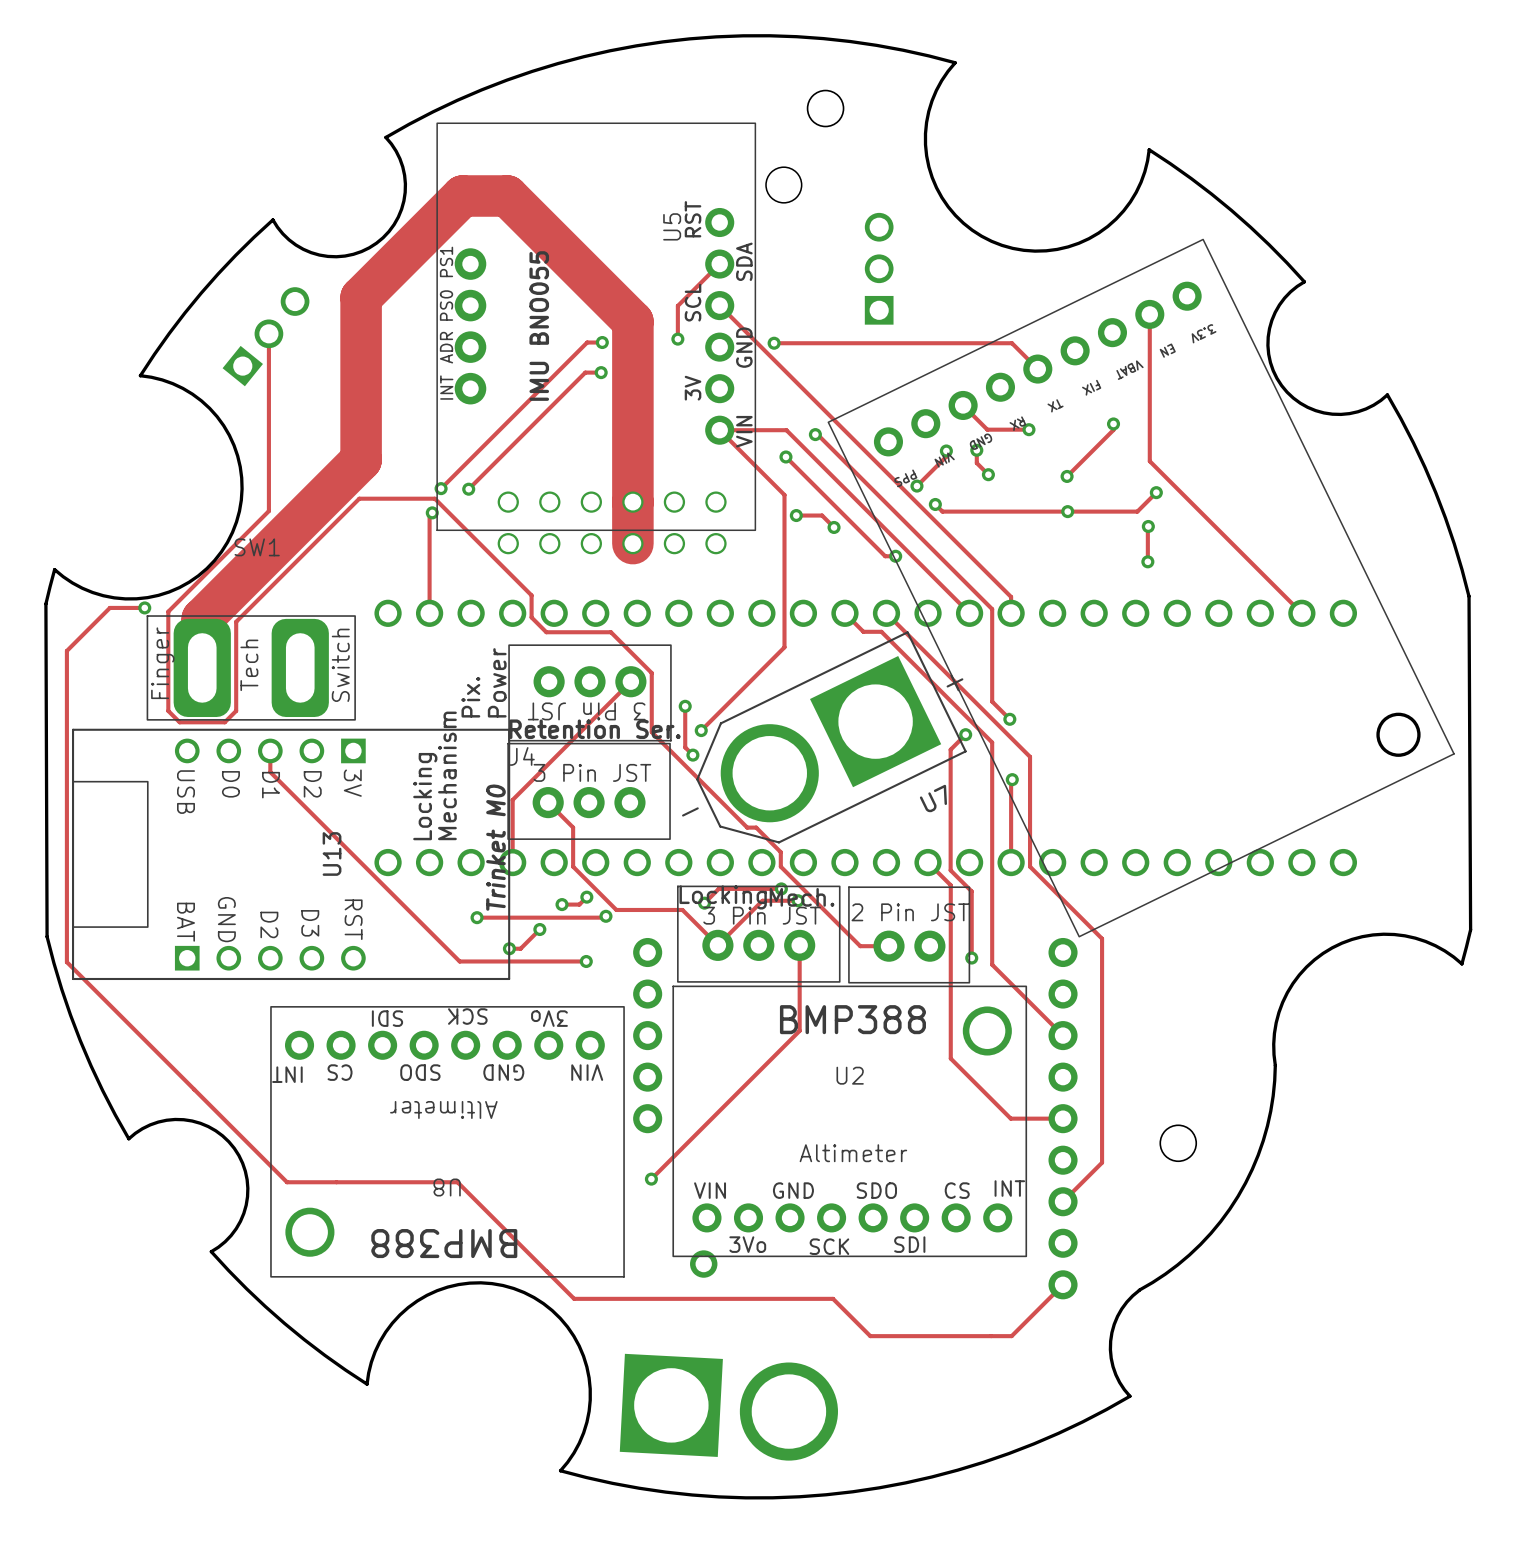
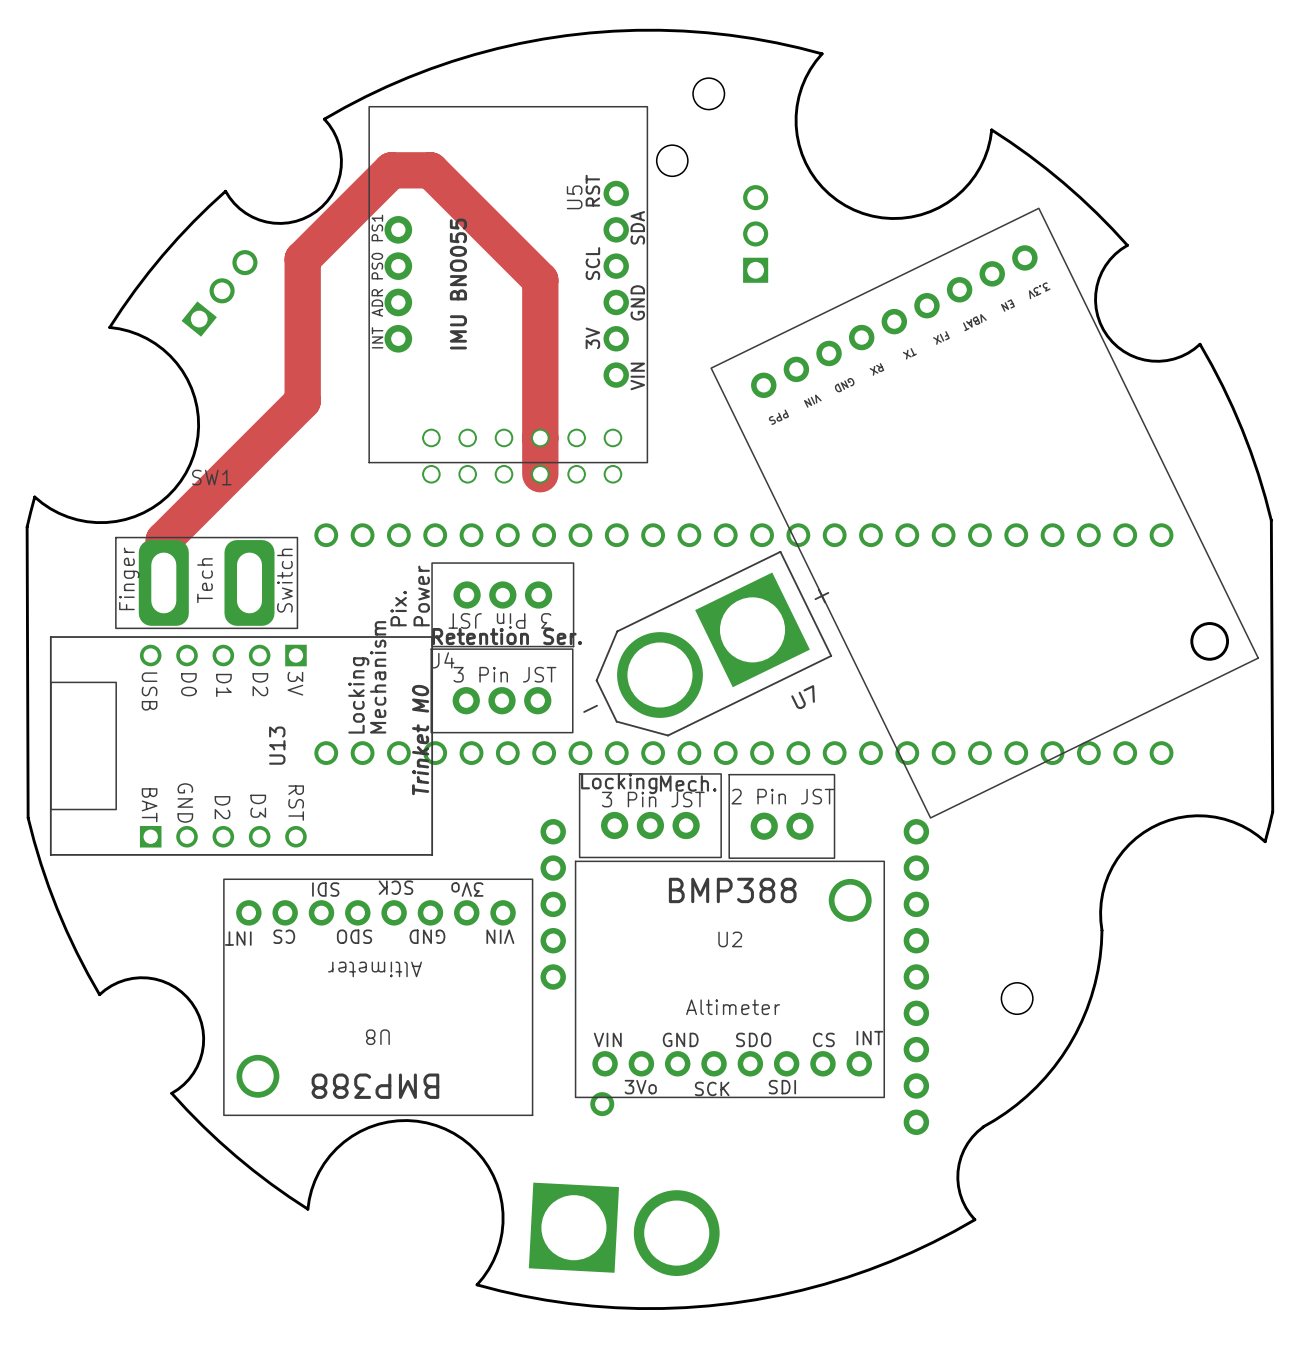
track: (719, 264) (677, 305) (677, 339) -> none
track: (719, 305) (1011, 596) (1011, 613) -> none
track: (1149, 314) (1149, 461) (1301, 613) -> none
track: (268, 333) (268, 511) (168, 611) (168, 710) (179, 722) (224, 722) (236, 710) (236, 621) (359, 498) (434, 498) (531, 595) (531, 617) (546, 632) (610, 632) (651, 673) (651, 732) (747, 827) (756, 827) (780, 852) (780, 866) (860, 946) (889, 946) -> none
via: (677, 339) -> none
track: (602, 342) (587, 342) (441, 488) -> none
via: (602, 342) -> none
track: (774, 343) (1011, 343) (1037, 369) -> none
via: (774, 343) -> none
track: (601, 372) (585, 372) (468, 489) -> none
via: (601, 372) -> none
track: (963, 405) (987, 429) (1028, 429) -> none
track: (1113, 423) (1113, 430) (1067, 476) -> none
via: (1113, 423) -> none
via: (1028, 429) -> none
track: (815, 434) (817, 434) (992, 609) (992, 701) (1009, 719) -> none
via: (815, 434) -> none
track: (946, 450) (946, 456) (916, 486) -> none
via: (946, 450) -> none
track: (976, 450) (976, 463) (988, 474) -> none
via: (976, 450) -> none
track: (785, 456) (885, 556) (895, 556) -> none
via: (785, 456) -> none
via: (988, 474) -> none
via: (1067, 476) -> none
via: (916, 486) -> none
via: (441, 488) -> none
via: (468, 489) -> none
track: (1156, 492) (1137, 511) (942, 511) (935, 504) -> none
via: (1156, 492) -> none
via: (935, 504) -> none
via: (1067, 511) -> none
track: (432, 512) (429, 515) (429, 613) -> none
via: (432, 512) -> none
track: (796, 515) (822, 515) (834, 527) -> none
via: (796, 515) -> none
track: (1148, 526) (1147, 561) -> none
via: (1148, 526) -> none
via: (834, 527) -> none
via: (895, 556) -> none
via: (1147, 561) -> none
track: (144, 607) (109, 607) (66, 650) (66, 962) (287, 1182) (457, 1182) (574, 1298) (833, 1298) (870, 1336) (1011, 1336) (1063, 1284) -> none
via: (144, 607) -> none
track: (844, 613) (863, 631) (881, 631) (992, 742) (992, 964) (1063, 1035) -> none
track: (886, 613) (1030, 756) (1030, 866) (1102, 938) (1102, 1162) (1063, 1201) -> none
track: (969, 613) (786, 430) (719, 430) (784, 494) (784, 647) (701, 730) -> none
track: (630, 681) (512, 799) (512, 862) -> none
track: (685, 706) (685, 747) (692, 755) -> none
via: (685, 706) -> none
via: (1009, 719) -> none
via: (701, 730) -> none
track: (965, 734) (950, 749) (950, 870) (971, 891) (971, 958) -> none
via: (965, 734) -> none
track: (270, 750) (270, 772) (459, 961) (586, 961) -> none
via: (692, 755) -> none
track: (1012, 779) (1011, 862) -> none
via: (1012, 779) -> none
track: (548, 802) (573, 827) (573, 866) (616, 909) (682, 909) (717, 945) (762, 900) (798, 900) -> none
track: (928, 862) (950, 885) (950, 1058) (1010, 1118) (1063, 1118) -> none
track: (781, 888) (718, 888) (704, 903) -> none
via: (781, 888) -> none
track: (586, 897) (579, 904) (562, 904) -> none
via: (586, 897) -> none
via: (798, 900) -> none
via: (704, 903) -> none
via: (562, 904) -> none
track: (605, 916) (477, 917) -> none
via: (605, 916) -> none
via: (477, 917) -> none
track: (539, 929) (520, 948) (509, 948) -> none
via: (539, 929) -> none
track: (799, 945) (799, 1030) (651, 1179) -> none
via: (509, 948) -> none
via: (971, 958) -> none
via: (586, 961) -> none
via: (651, 1179) -> none

